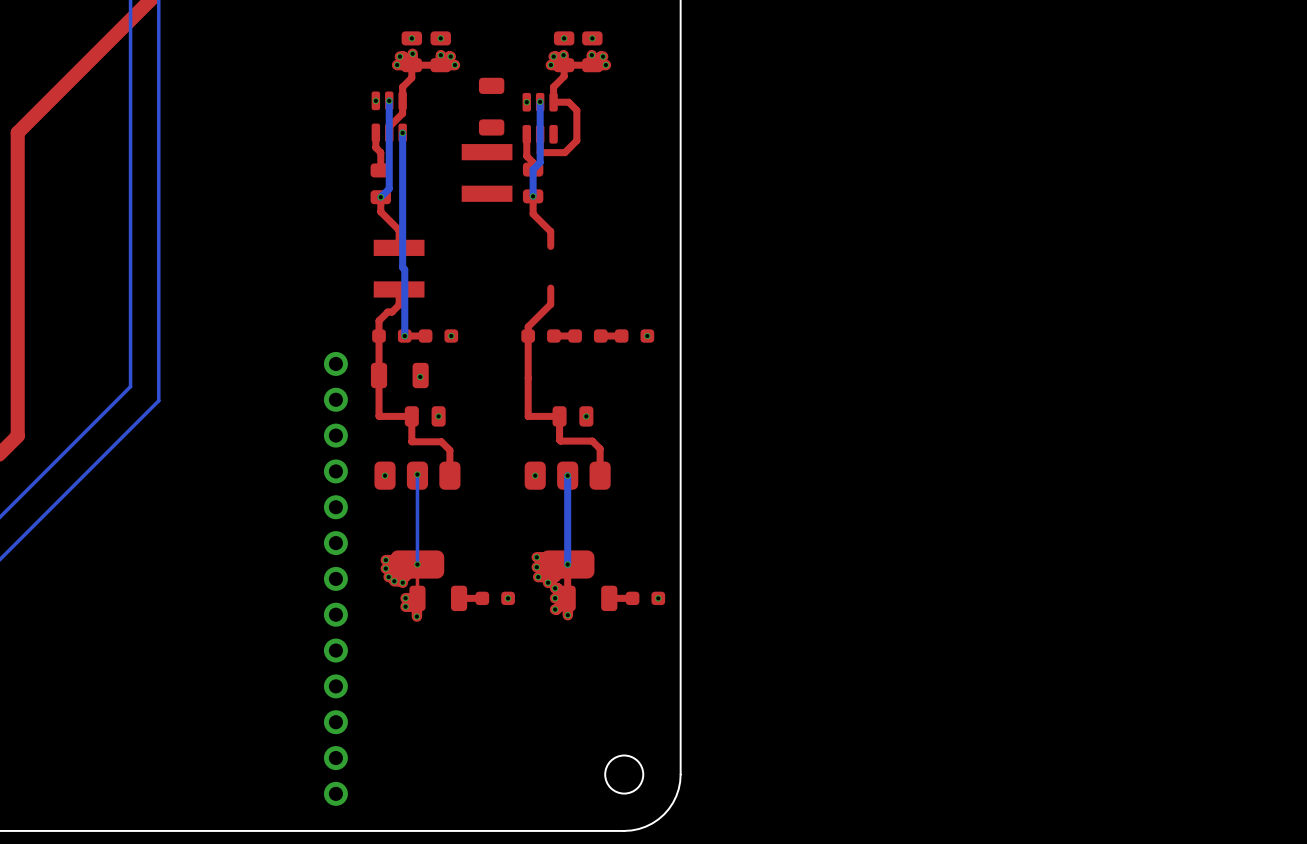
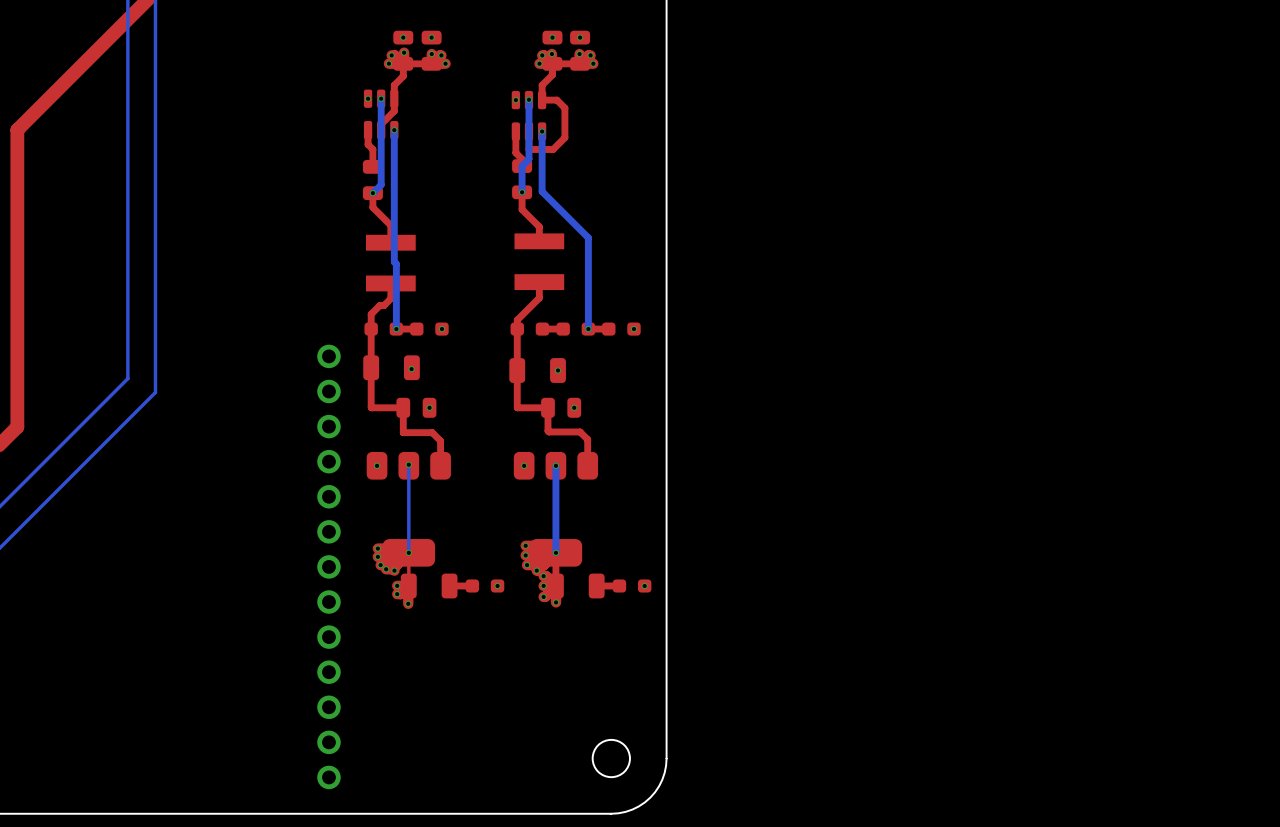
part rotation: 0° (491, 106) -> 90° clockwise (537, 370)
part position: (491, 106) -> (537, 370)
bottom track: none -> (542, 131) (542, 191) (588, 237) (588, 329)
via: none -> (542, 131)
part position: (487, 172) -> (539, 261)
via: none -> (588, 329)
via: none -> (558, 370)

